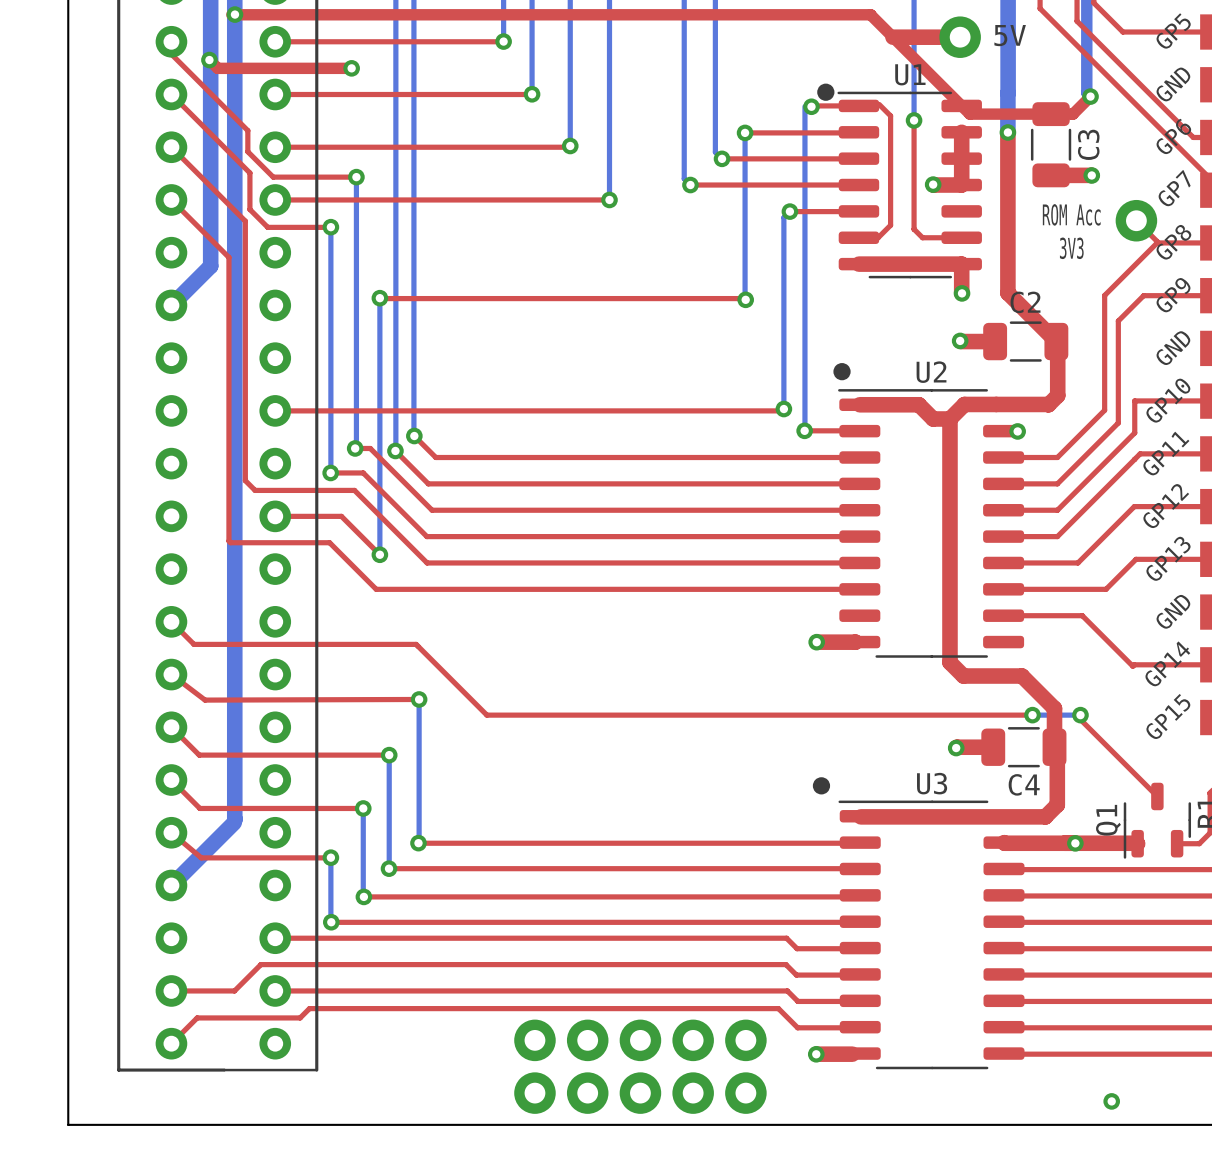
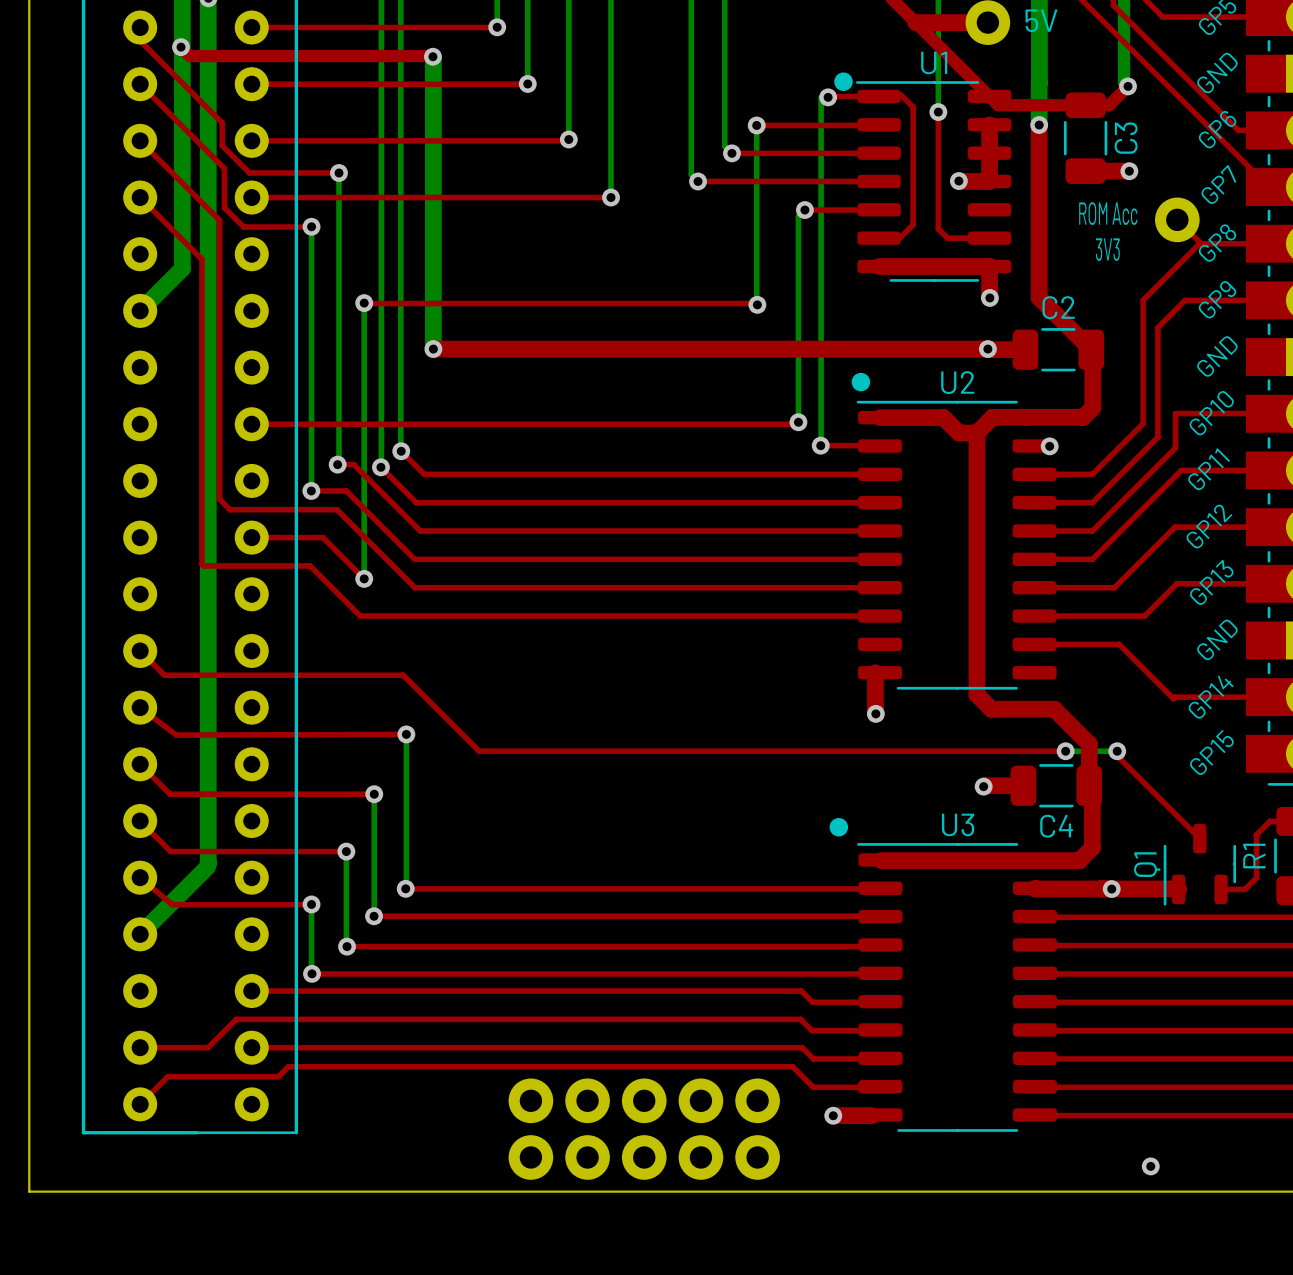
top track: none -> (333, 56) (433, 56)
via: (351, 68) -> none
bottom track: none -> (432, 56) (433, 349)
via: none -> (432, 56)
top track: none -> (433, 349) (987, 349)
via: none -> (433, 349)
top track: (816, 642) (855, 642) -> (875, 713) (875, 672)
via position: (816, 642) -> (875, 713)

